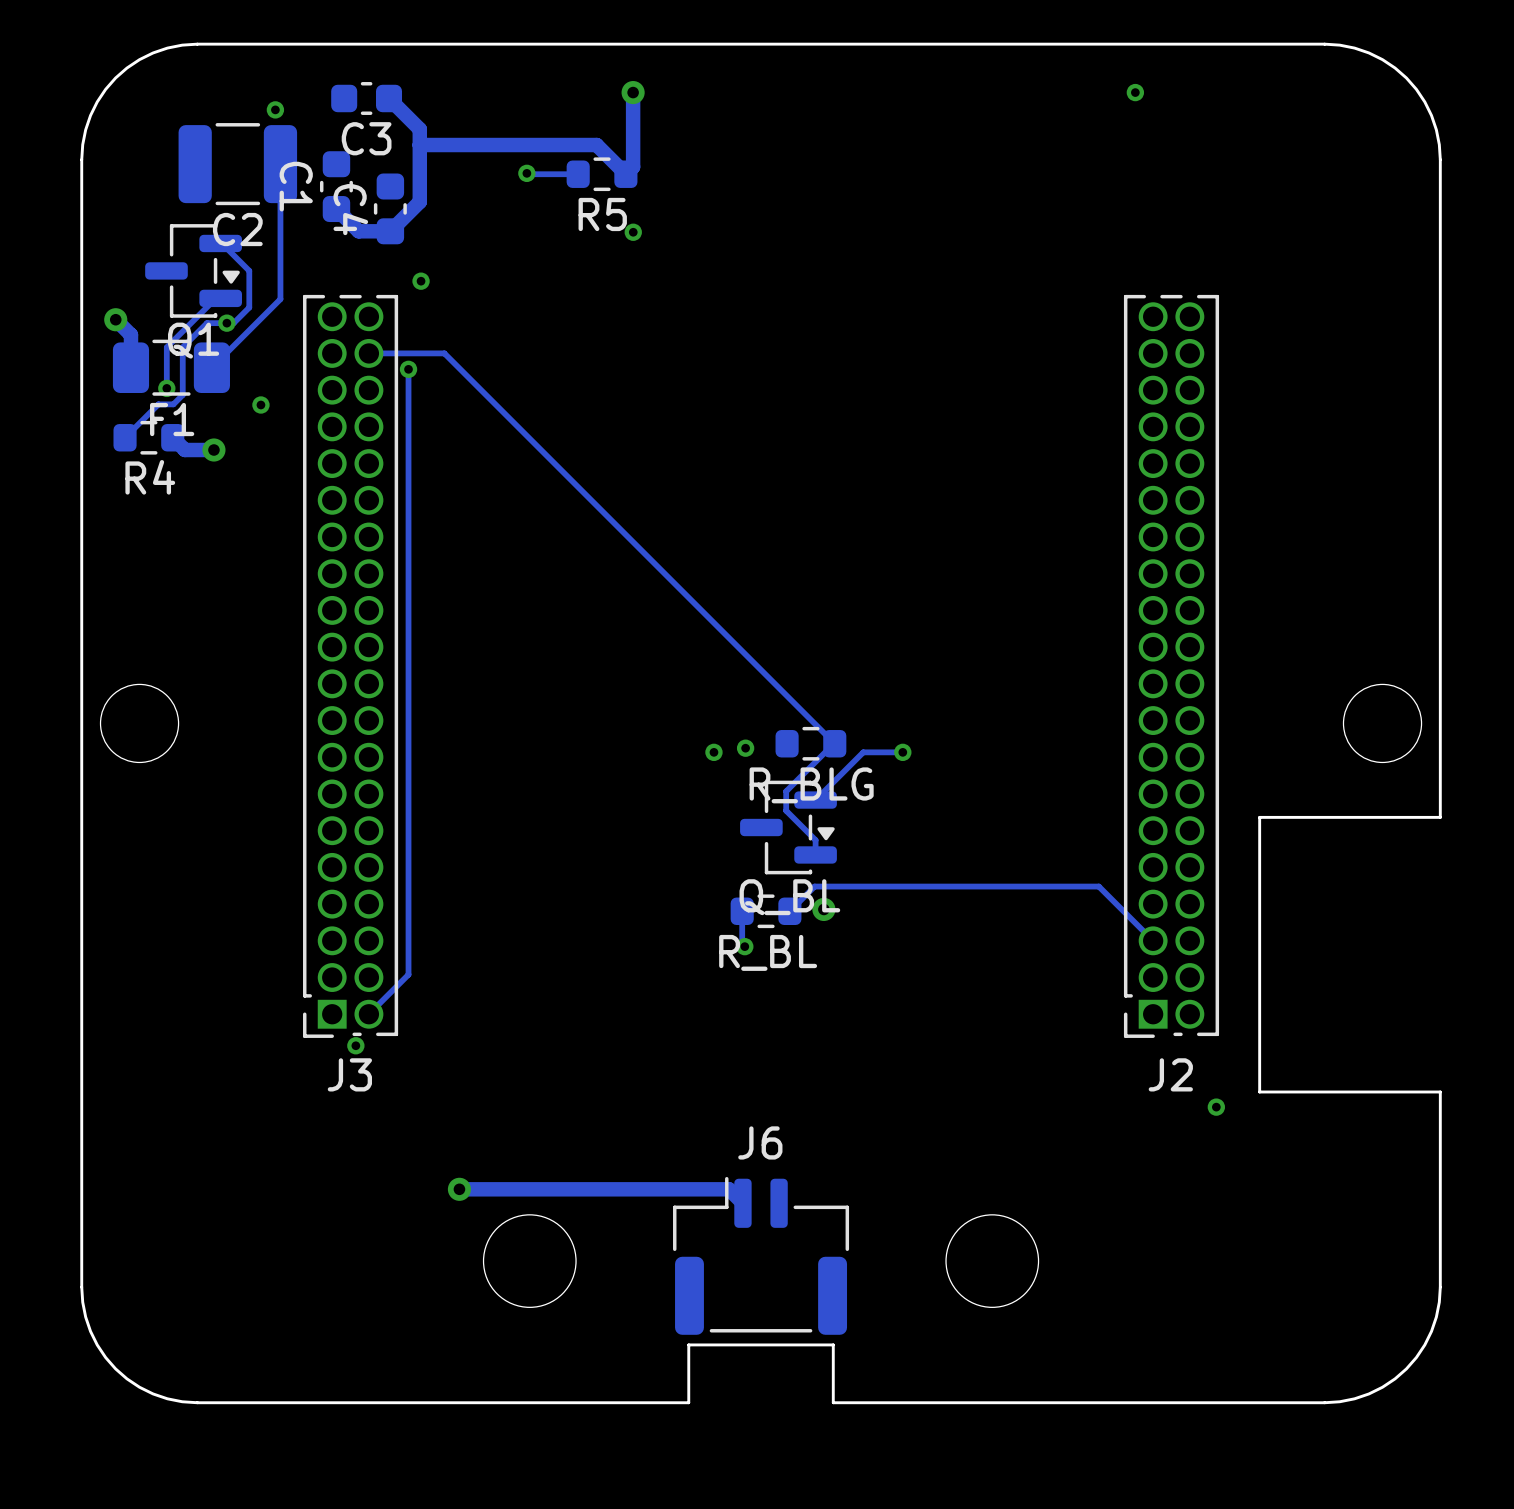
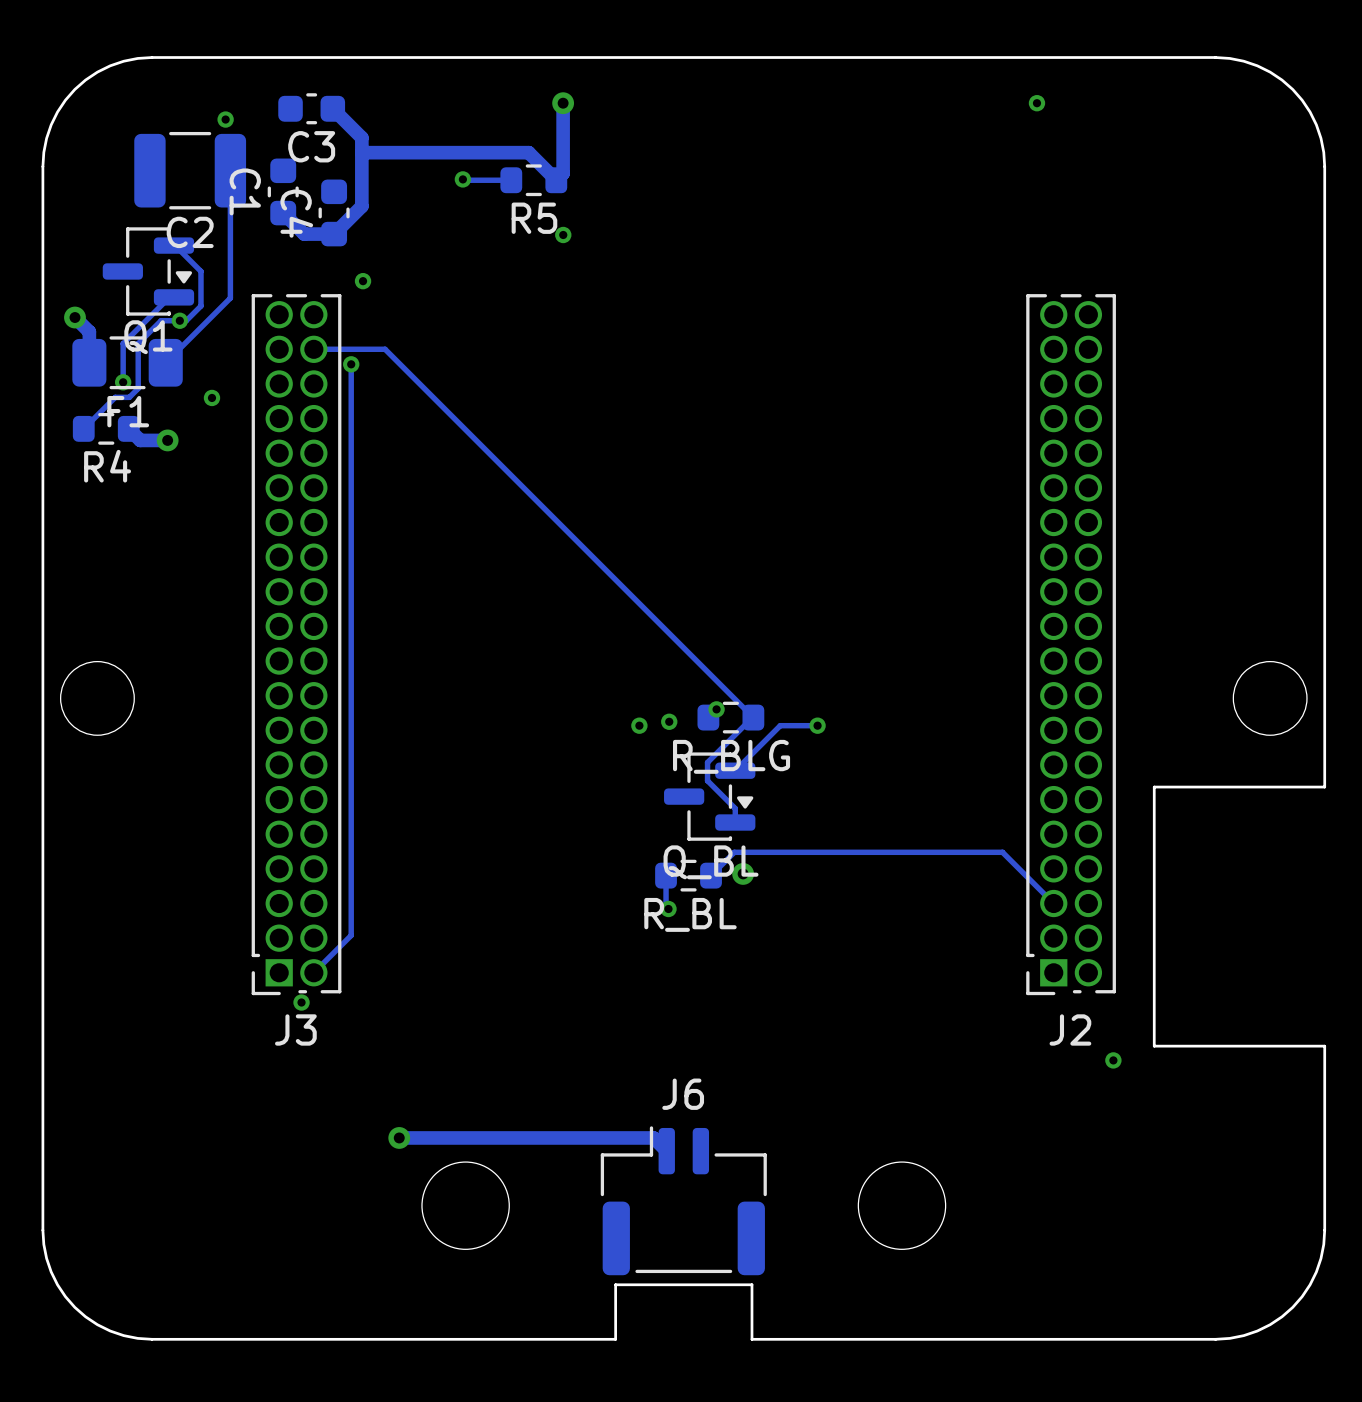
via: none -> (716, 709)

